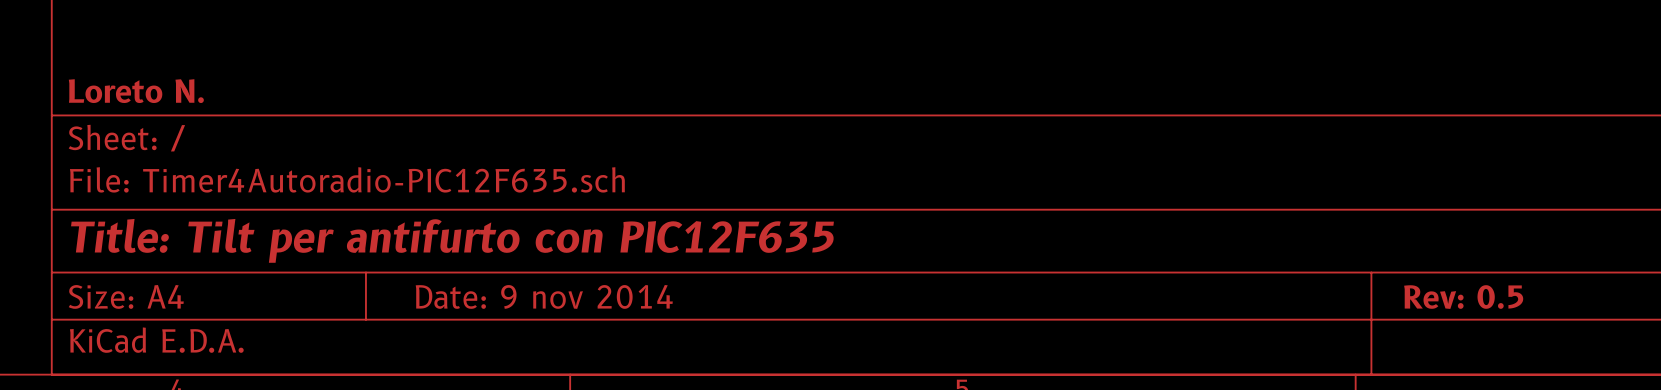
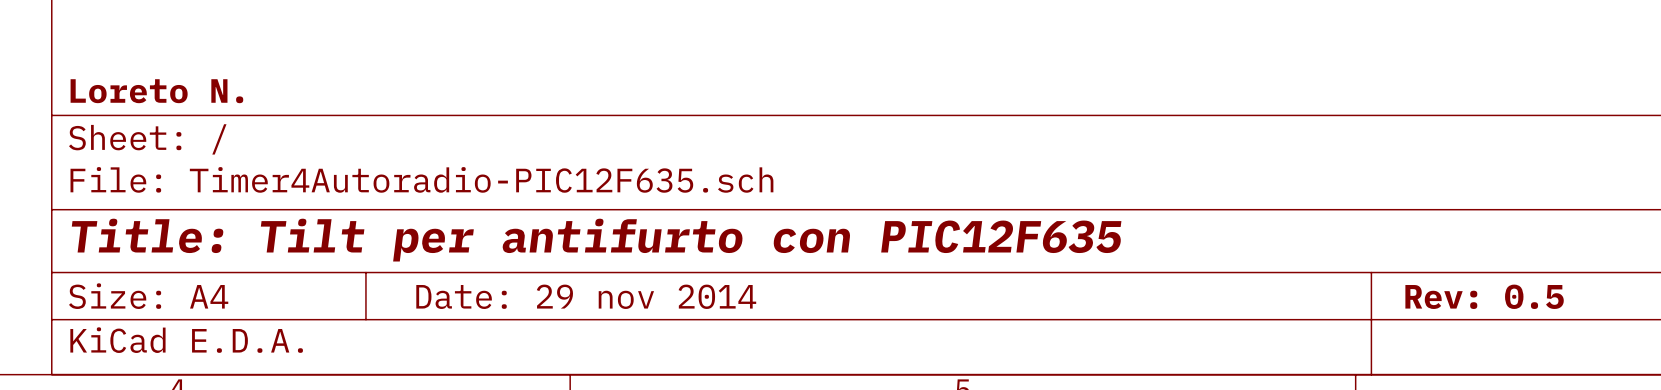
title block: Date: 9 nov 2014 (544, 296) -> Date: 29 nov 2014 (586, 296)

